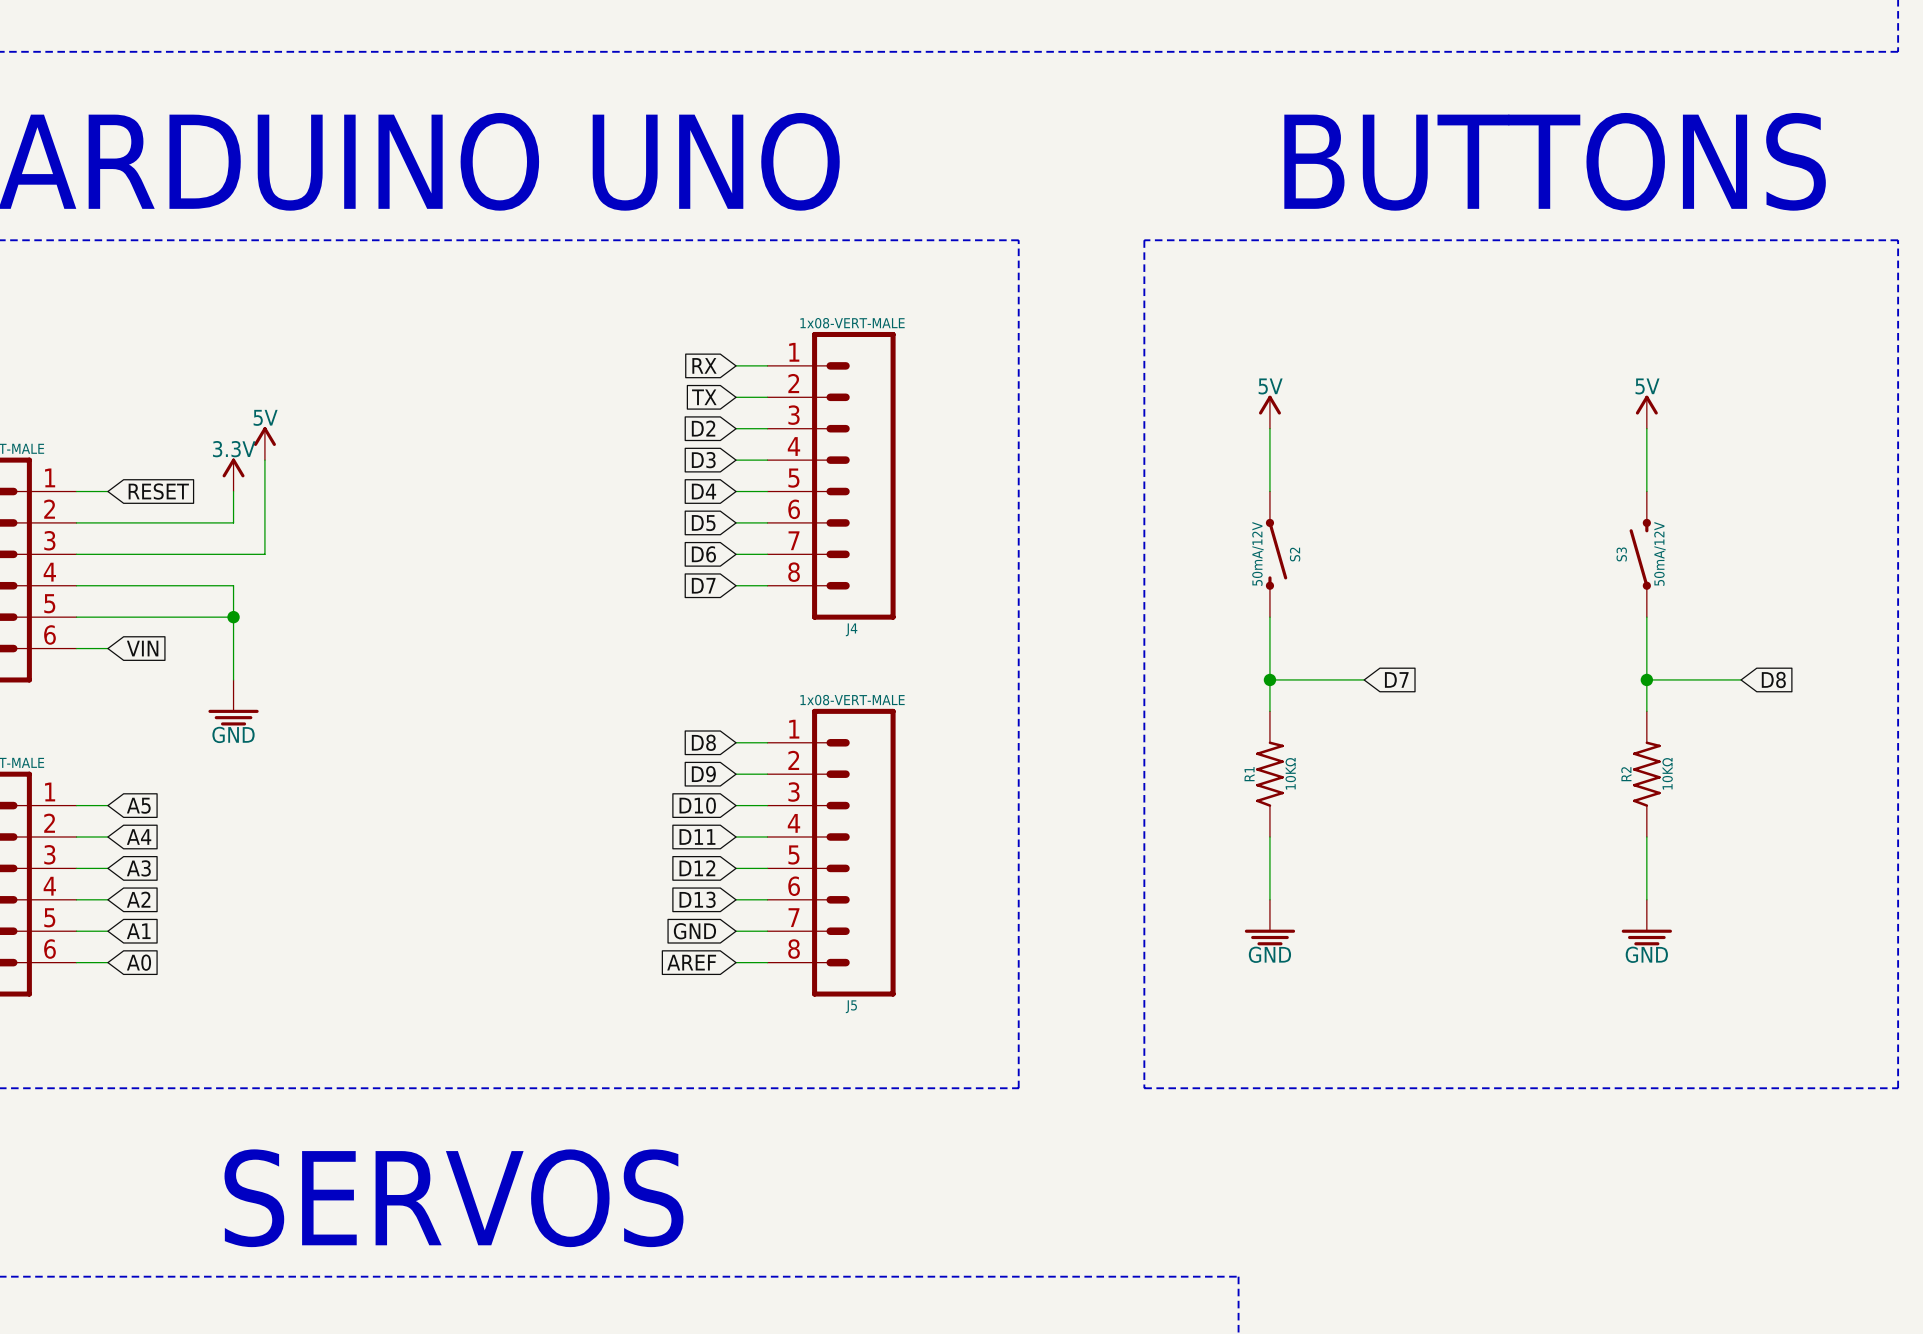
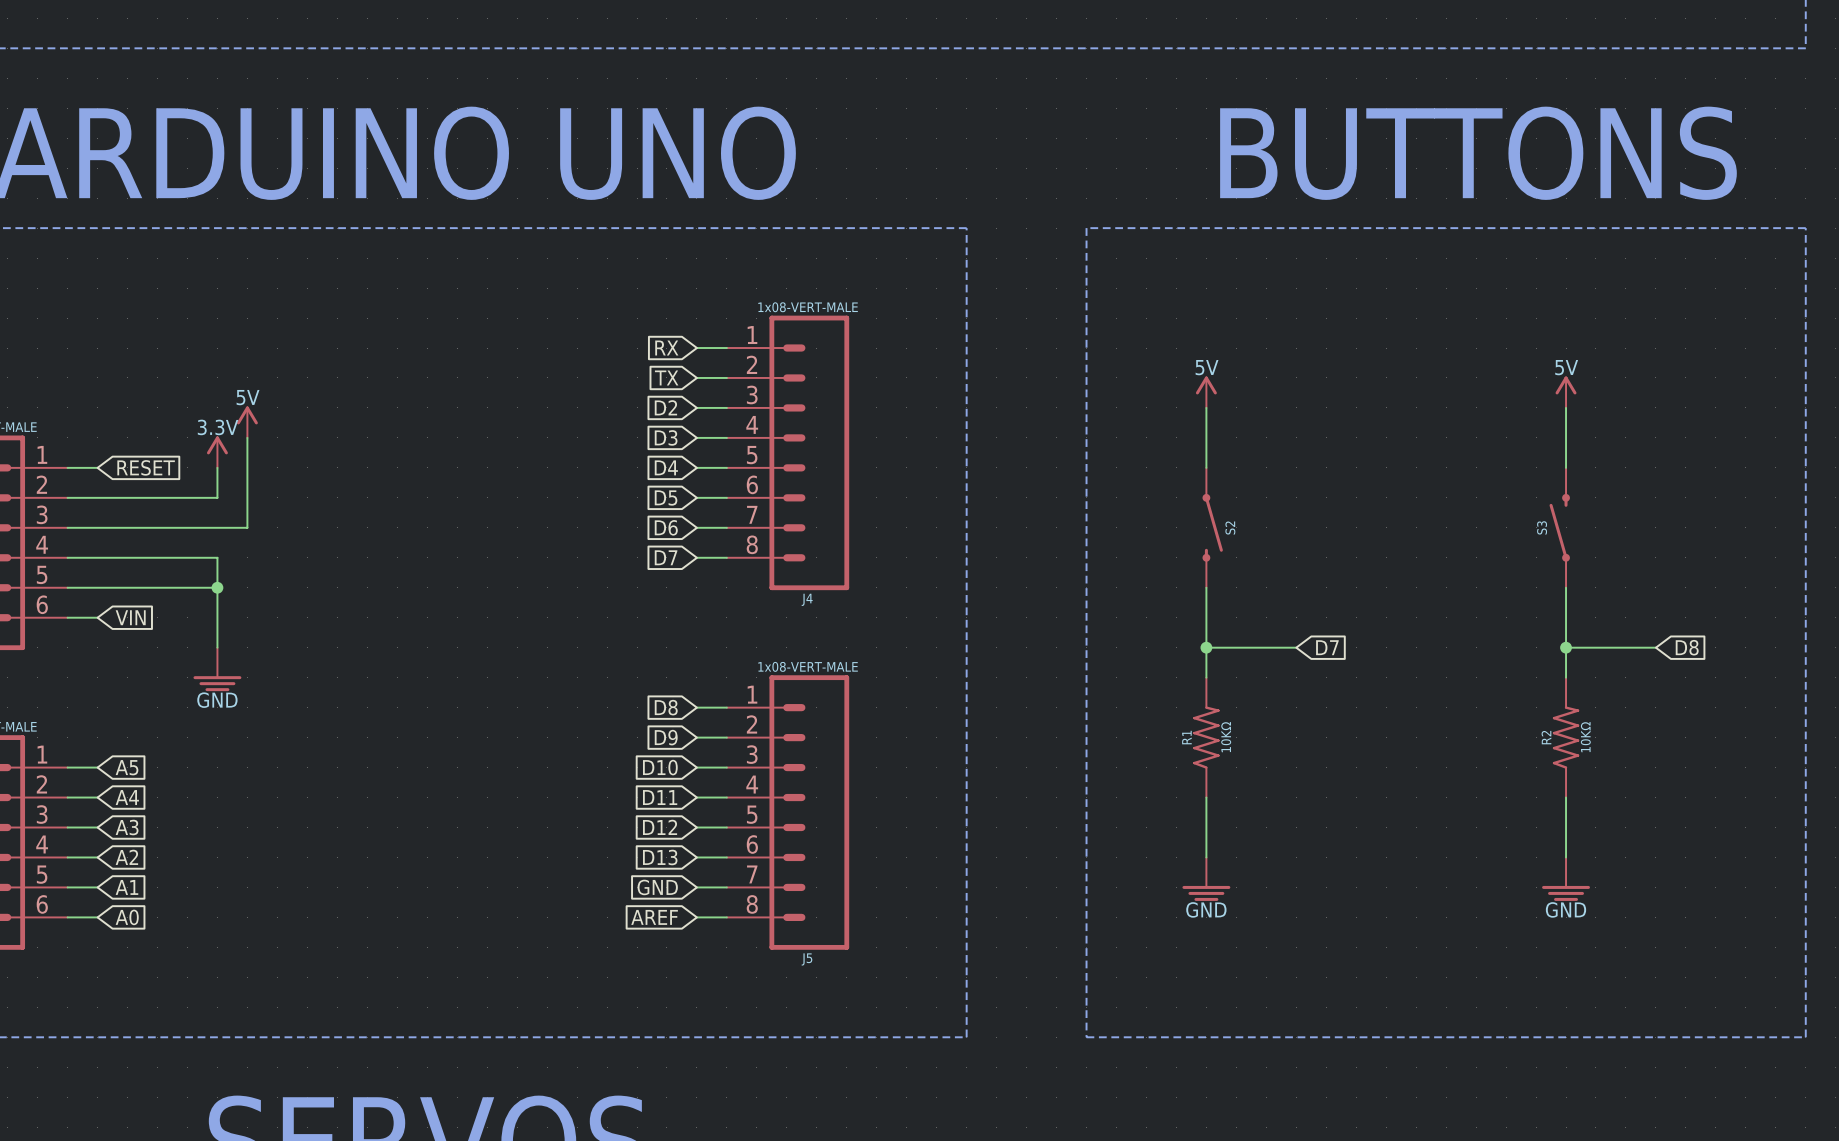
S2 value: 50mA/12V (1257, 553) -> none
S3 value: 50mA/12V (1659, 553) -> none

